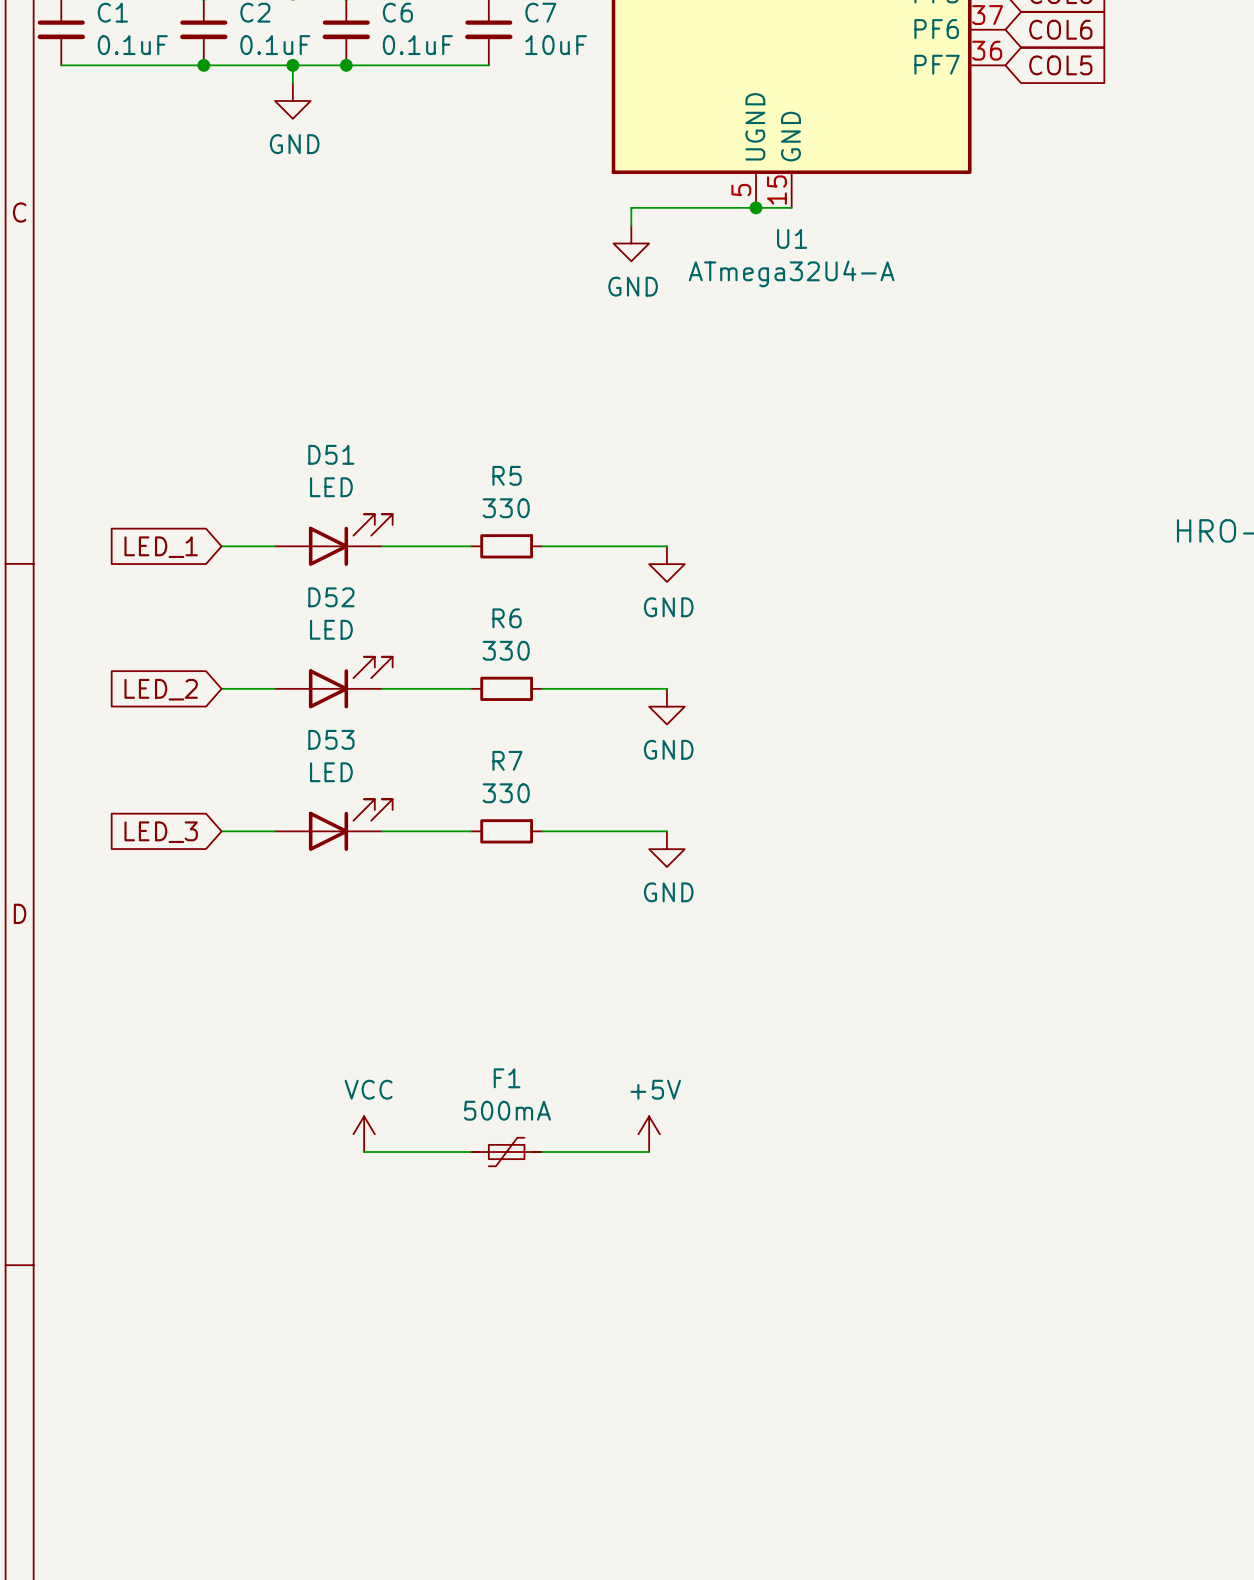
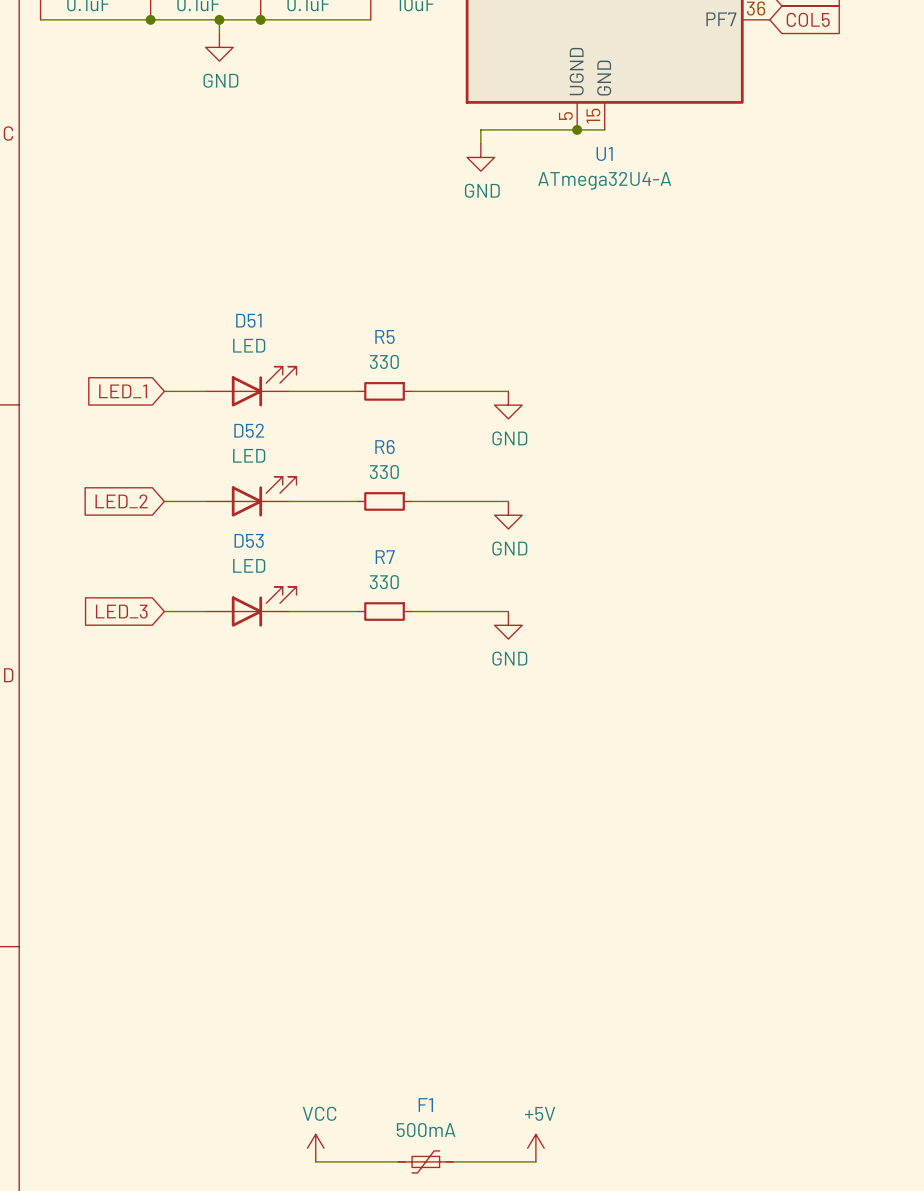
power symbol: VCC (364, 1134) -> none
power symbol: +5V (649, 1134) -> none
wire: (364, 1152) (471, 1152) -> none
F1 position: (506, 1152) -> (425, 1161)
wire: (542, 1152) (649, 1152) -> none
power symbol: none -> VCC (315, 1148)
power symbol: none -> +5V (535, 1148)
wire: none -> (315, 1161) (398, 1161)
wire: none -> (453, 1161) (535, 1161)

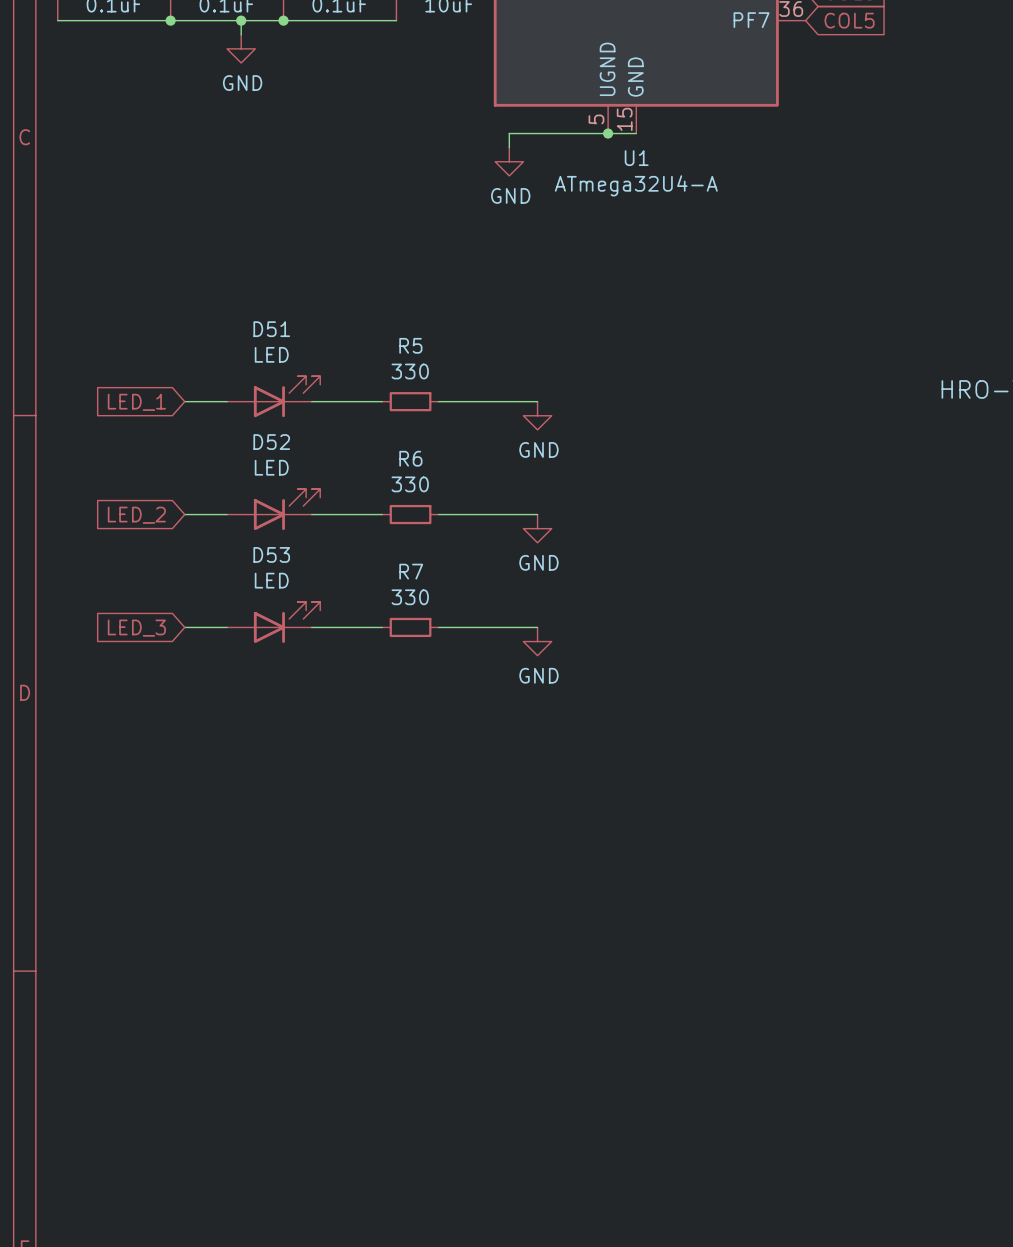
power symbol: VCC (315, 1148) -> none
power symbol: +5V (535, 1148) -> none
wire: (315, 1161) (398, 1161) -> none
F1: 500mA (425, 1161) -> none
wire: (453, 1161) (535, 1161) -> none

